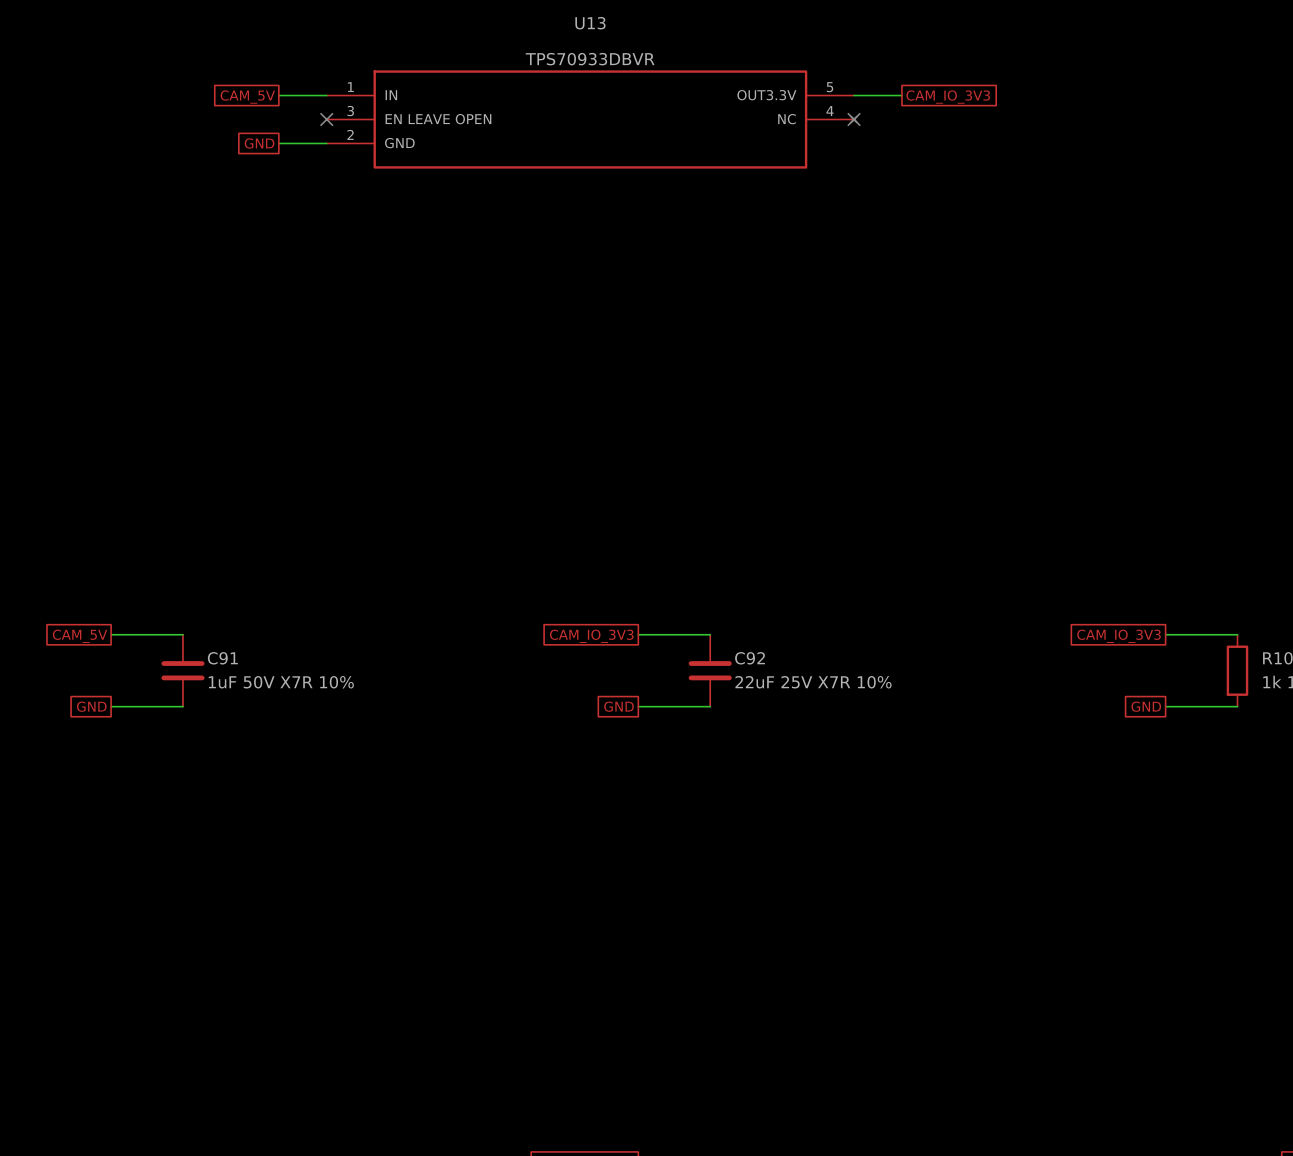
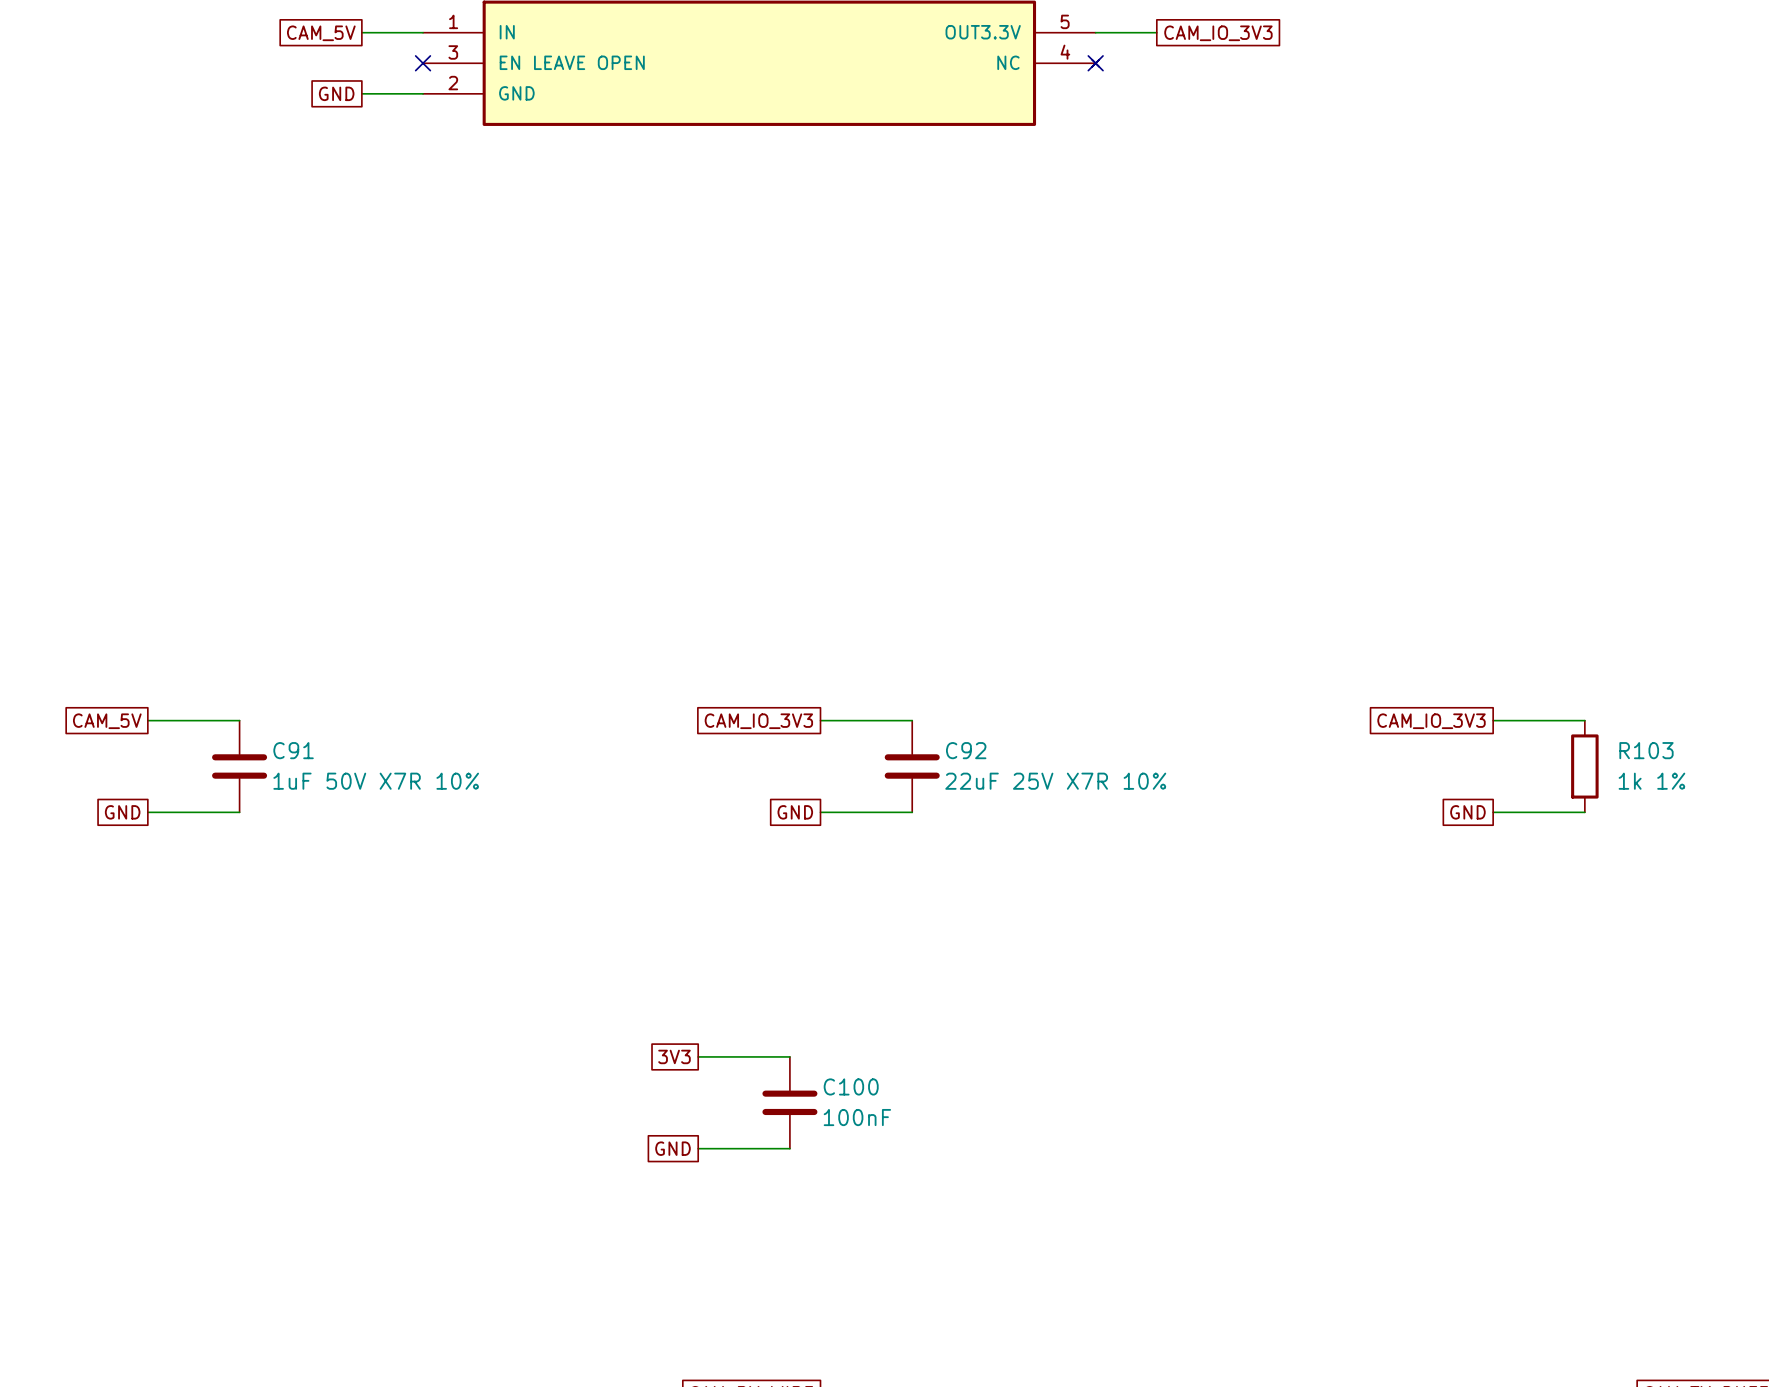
global label: none -> 3V3 (674, 1056)
wire: none -> (698, 1056) (789, 1056)
C100: none -> 100nF (789, 1102)
global label: none -> GND (672, 1148)
wire: none -> (698, 1148) (789, 1148)

